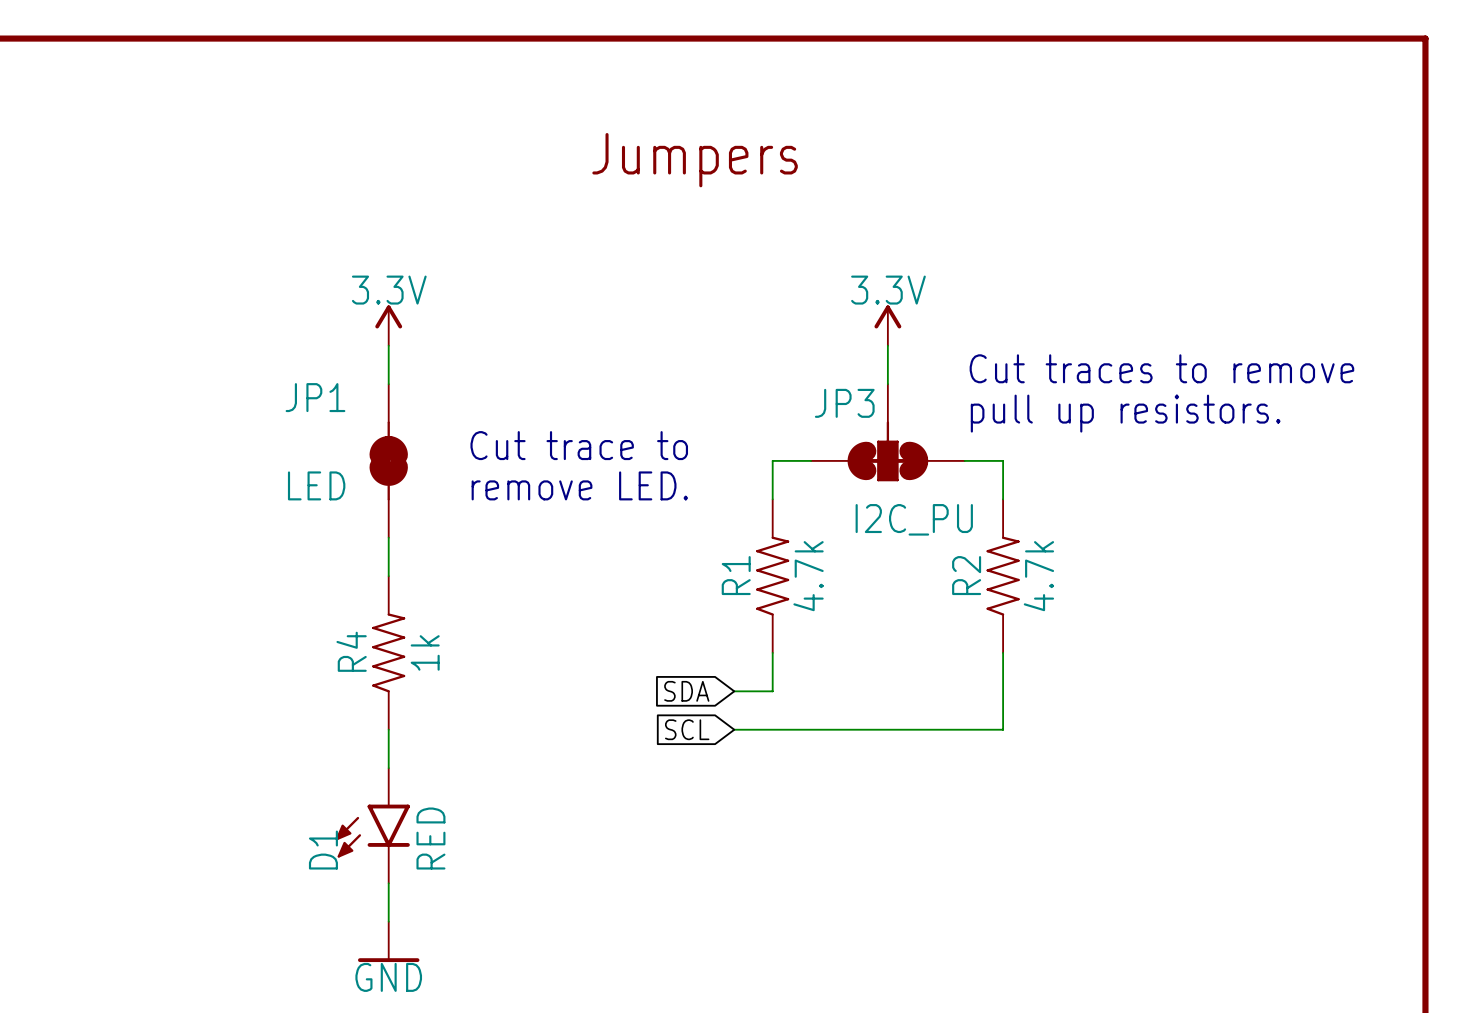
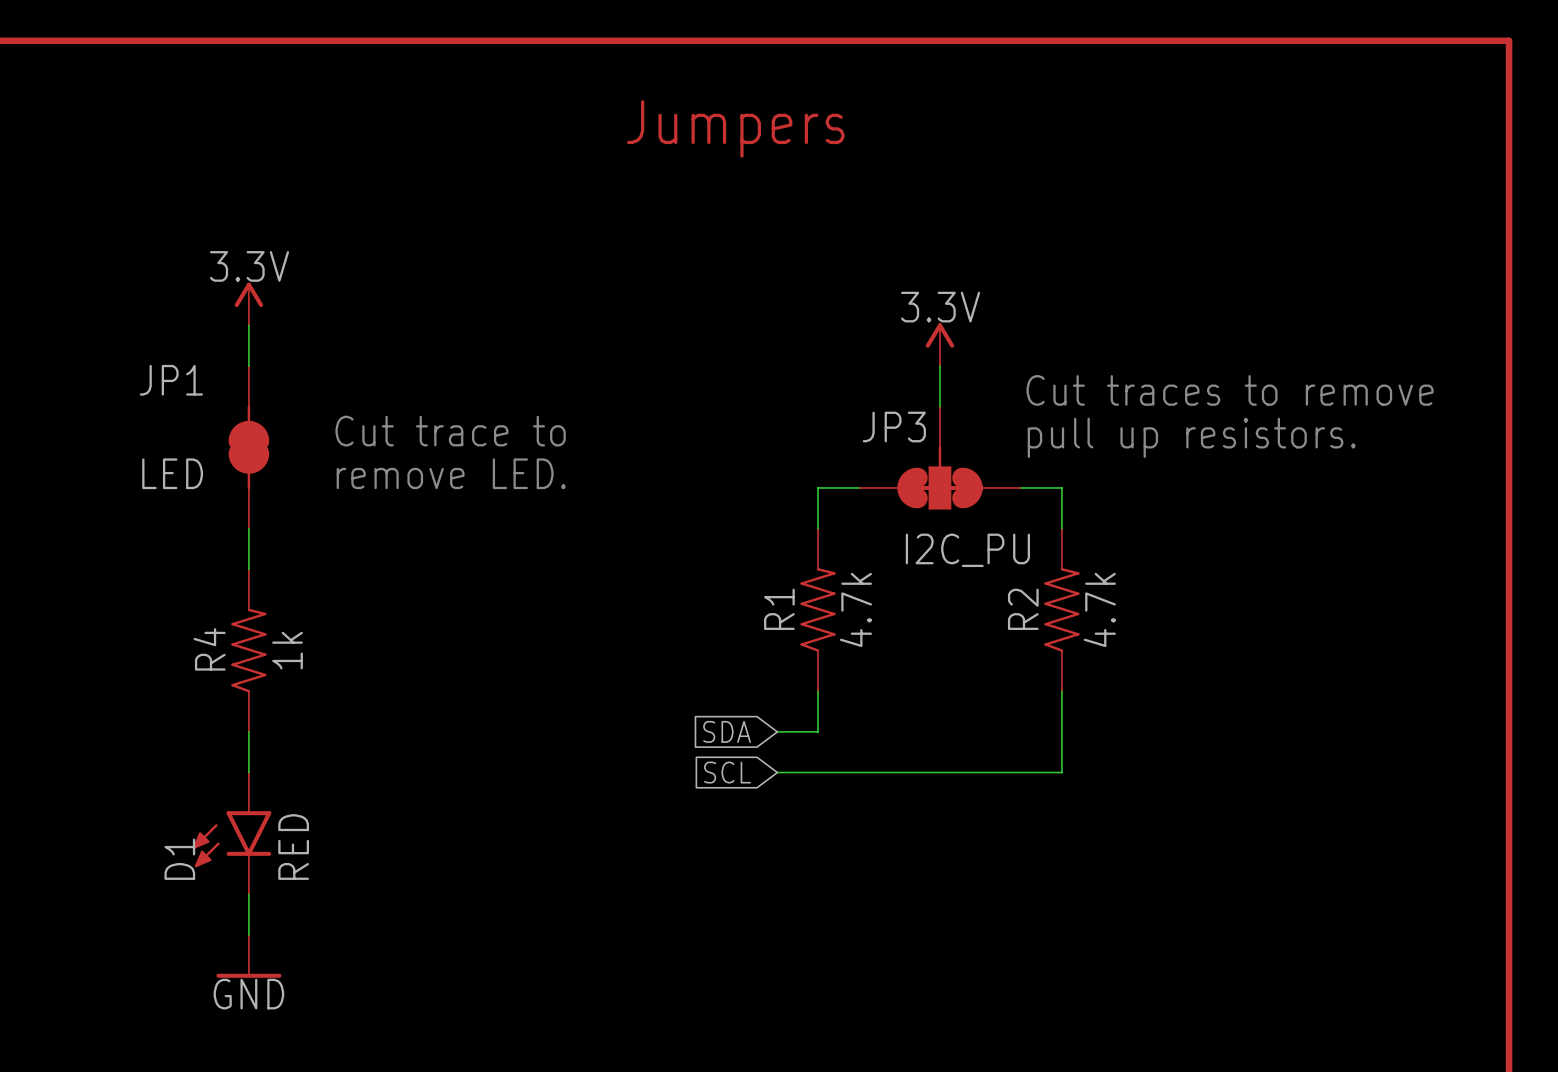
text position: Jumpers (695, 160) -> Jumpers (735, 128)
power symbol position: 3.3V (388, 325) -> 3.3V (248, 304)
wire: (388, 345) (388, 384) -> (248, 325) (248, 366)
text position: Cut trace to (579, 445) -> Cut trace to (450, 431)
JP1 position: (388, 460) -> (248, 447)
text position: remove LED. (579, 485) -> remove LED. (451, 473)
wire: (388, 537) (388, 576) -> (248, 528) (248, 569)
R4 position: (388, 652) -> (248, 650)
wire: (388, 729) (388, 768) -> (248, 731) (248, 772)
D1 position: (372, 825) -> (232, 833)
wire: (388, 883) (388, 921) -> (248, 894) (248, 935)
power symbol position: GND (388, 941) -> GND (248, 956)

